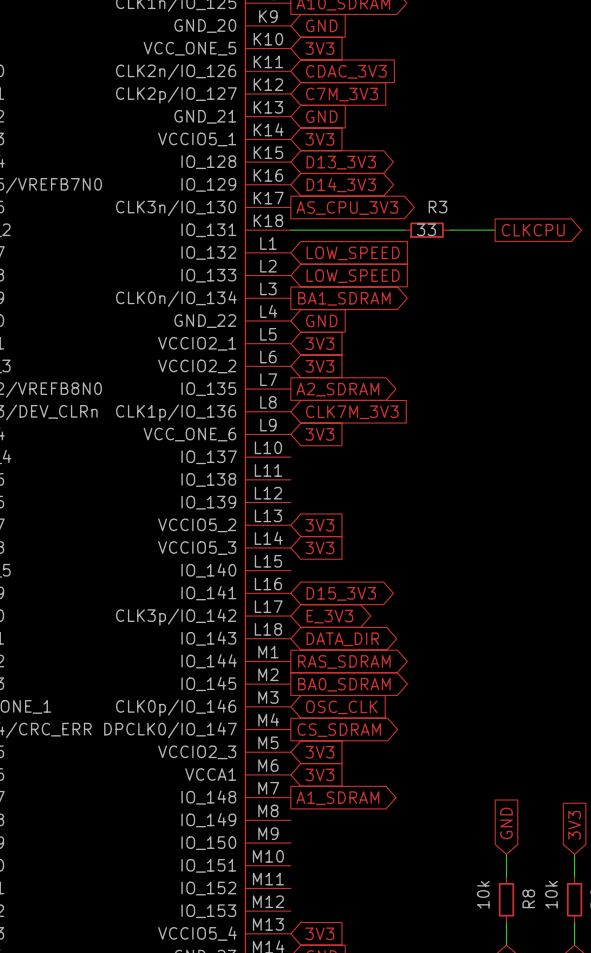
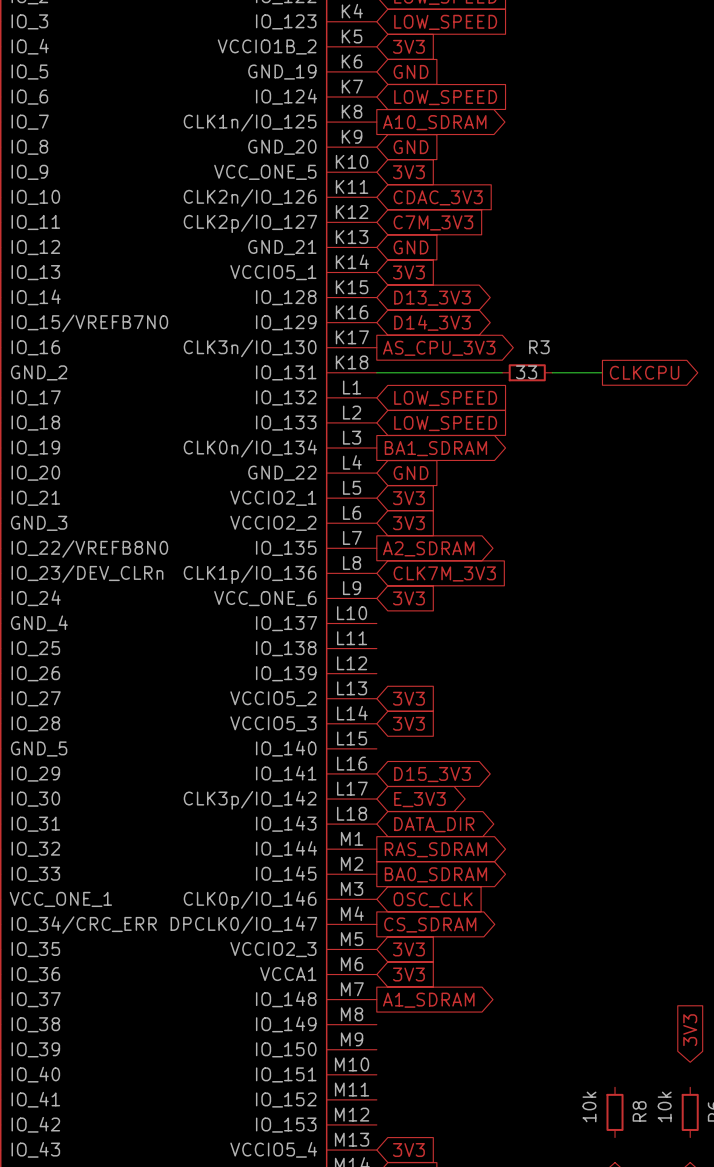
global label: GND (506, 823) -> none
wire: (506, 854) (506, 877) -> none
wire: (574, 854) (574, 877) -> none
wire: (506, 922) (506, 945) -> none
wire: (574, 922) (574, 945) -> none

